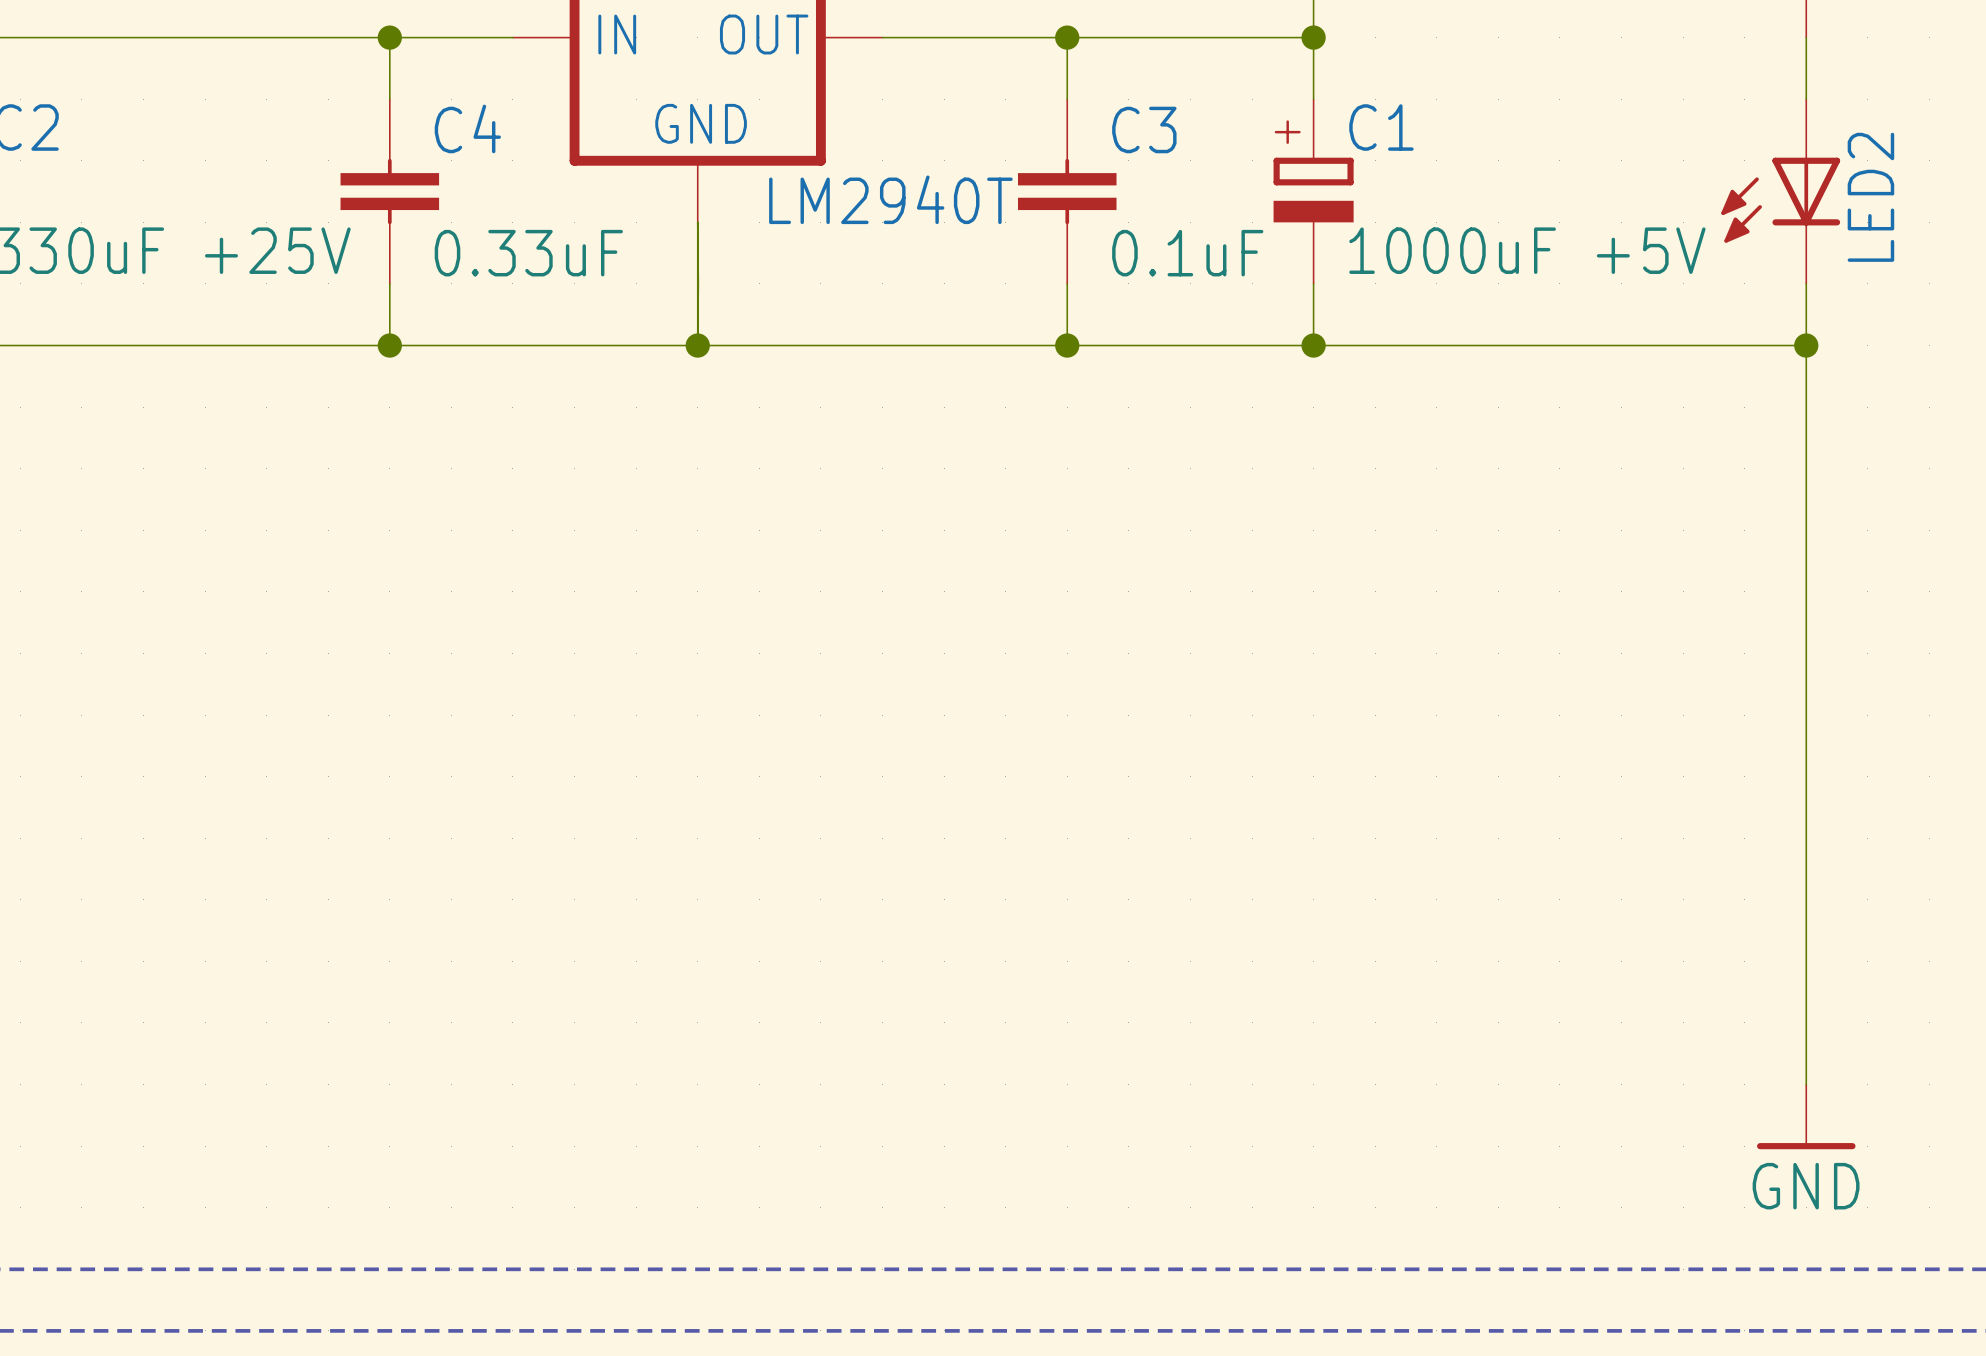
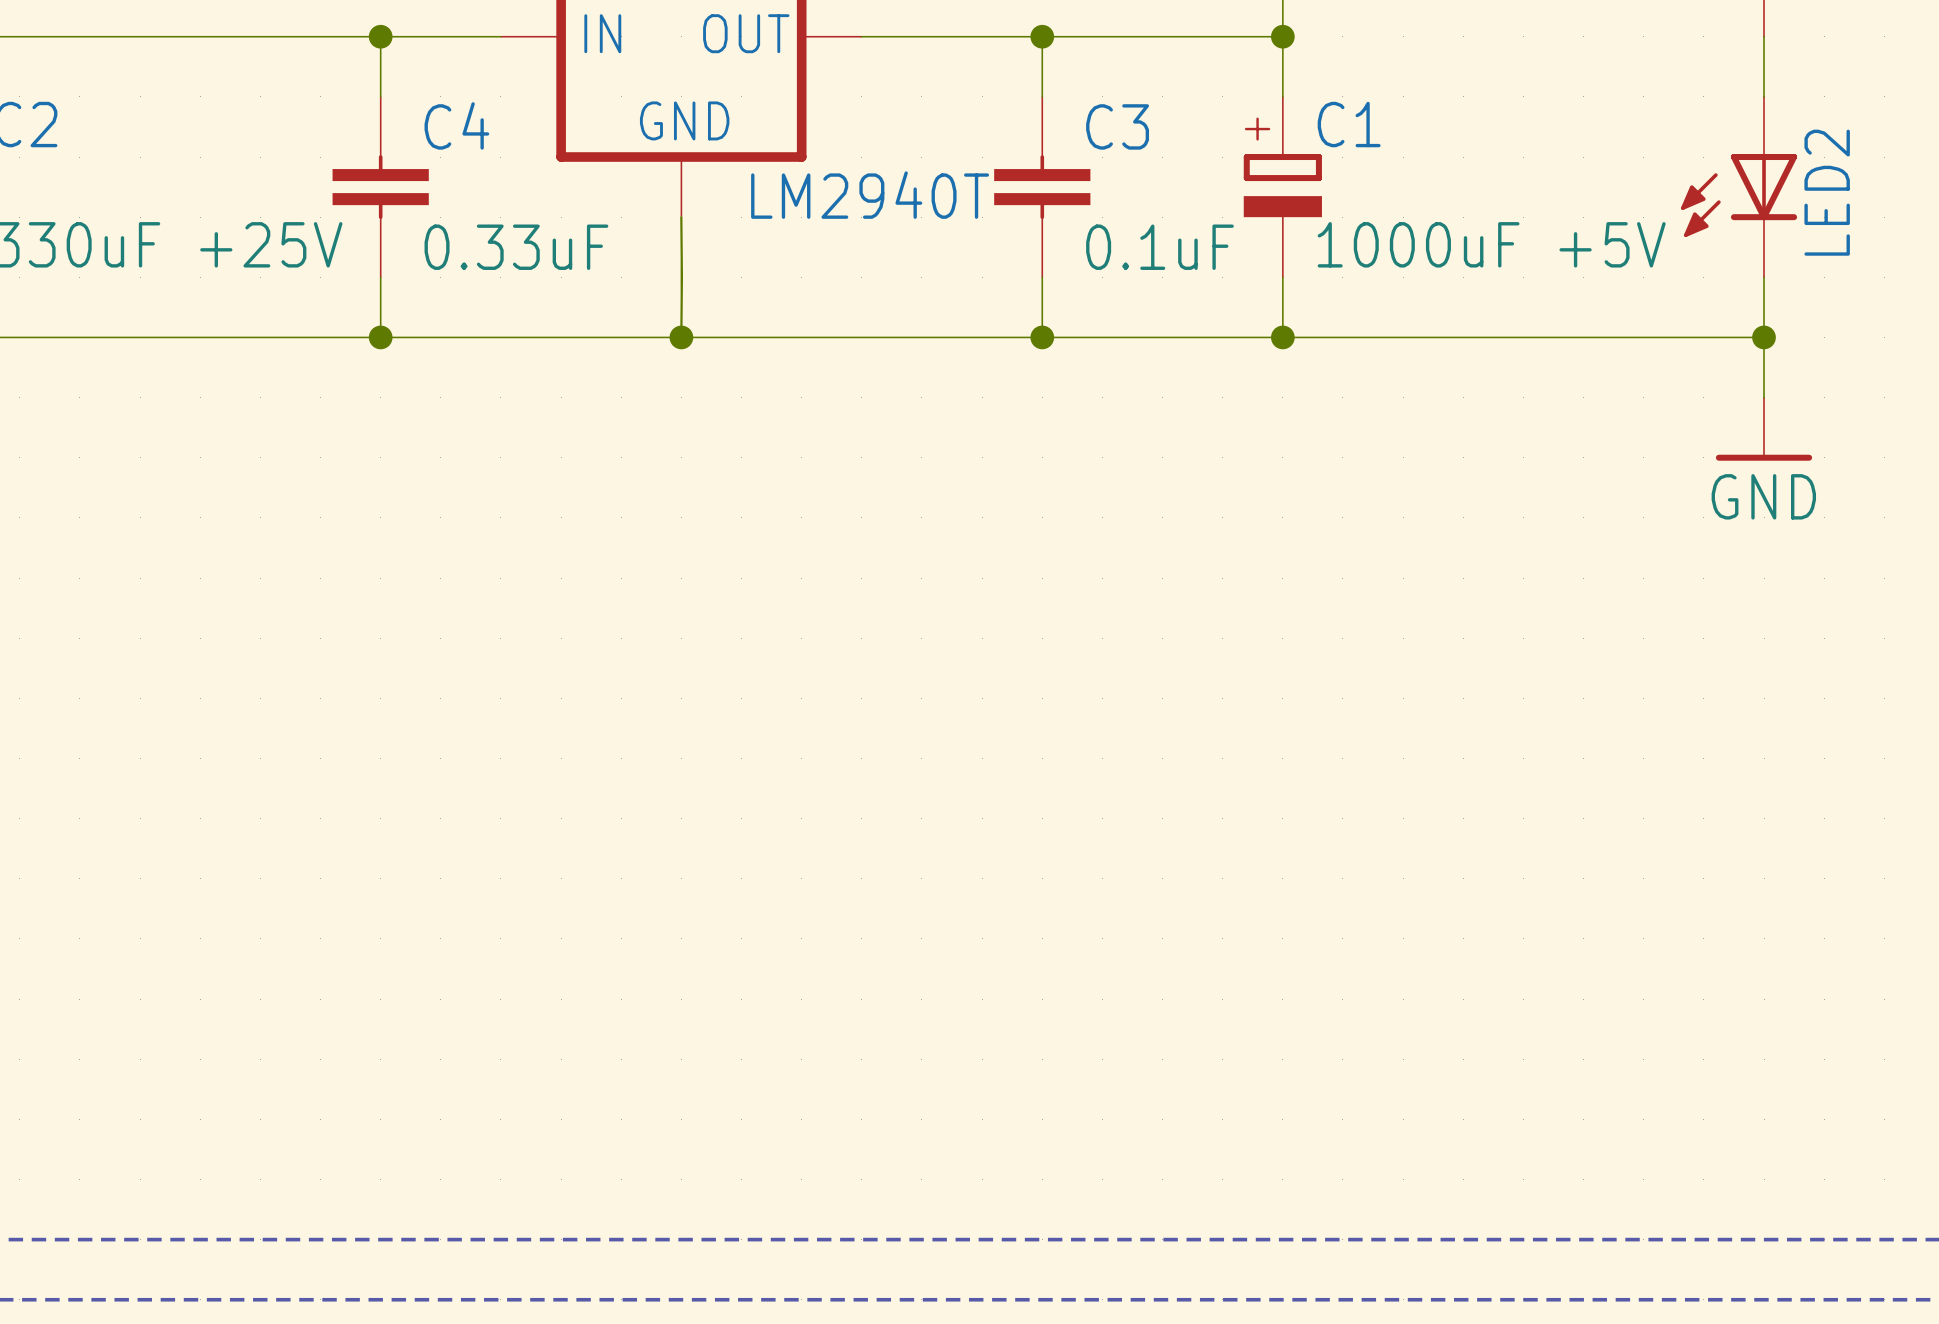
wire: (1806, 407) (1806, 1084) -> none
power symbol: none -> GND (1764, 429)
power symbol: GND (1806, 1116) -> none

